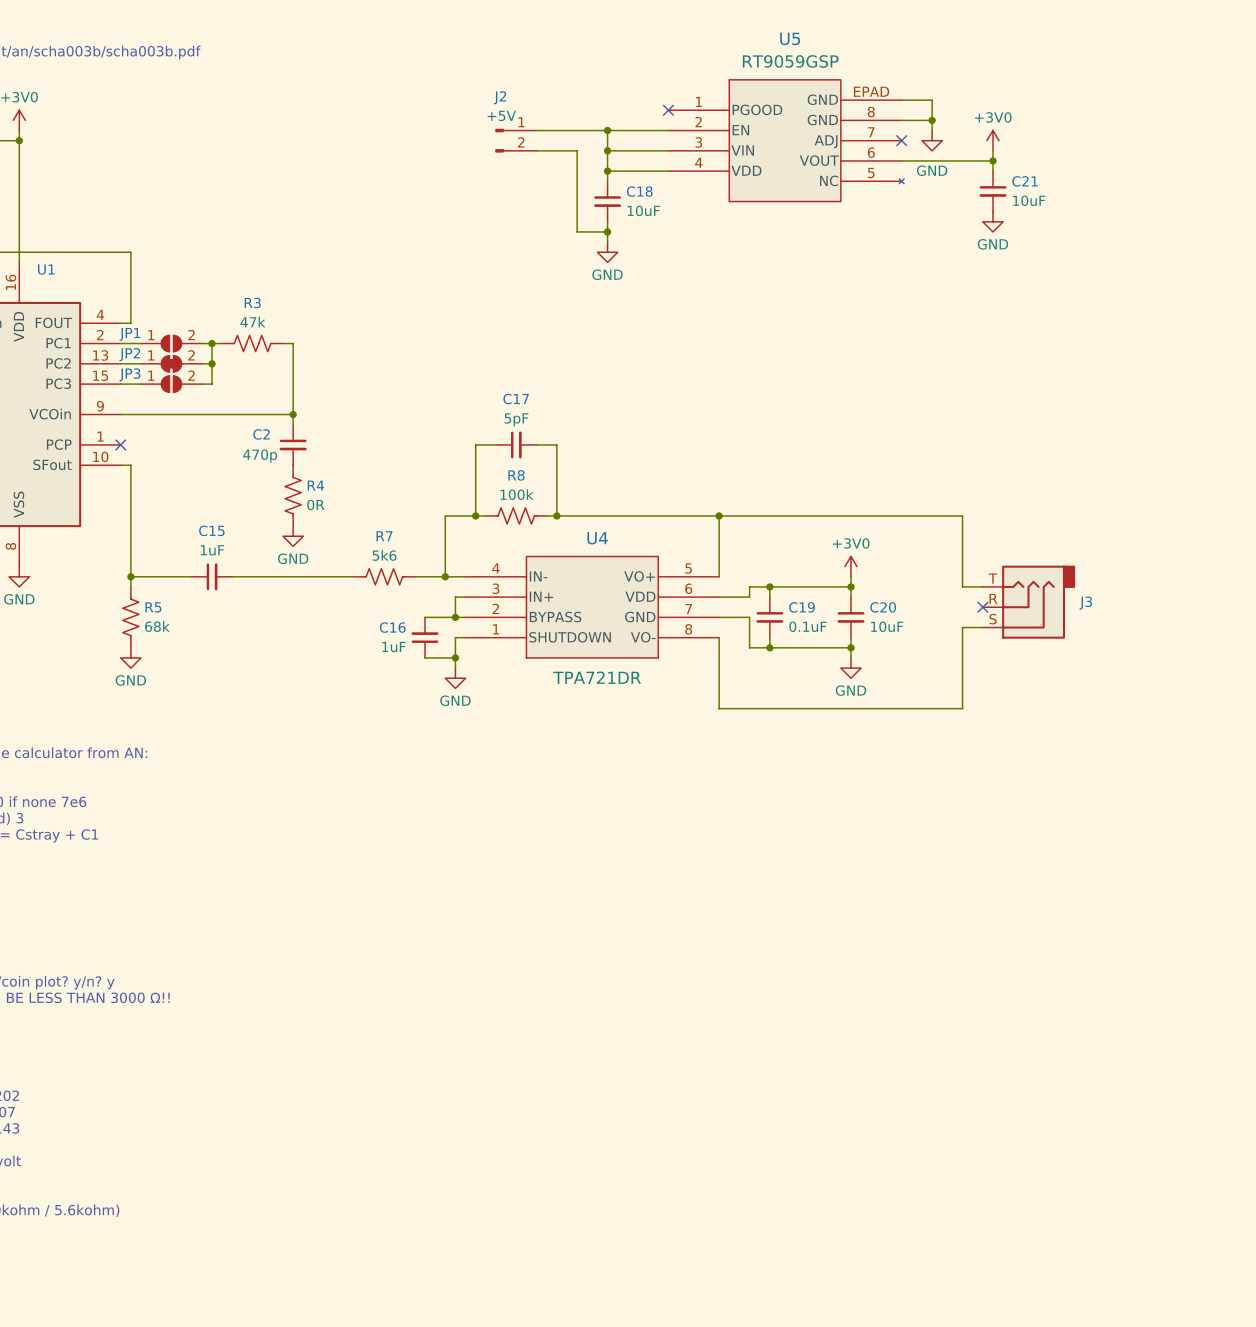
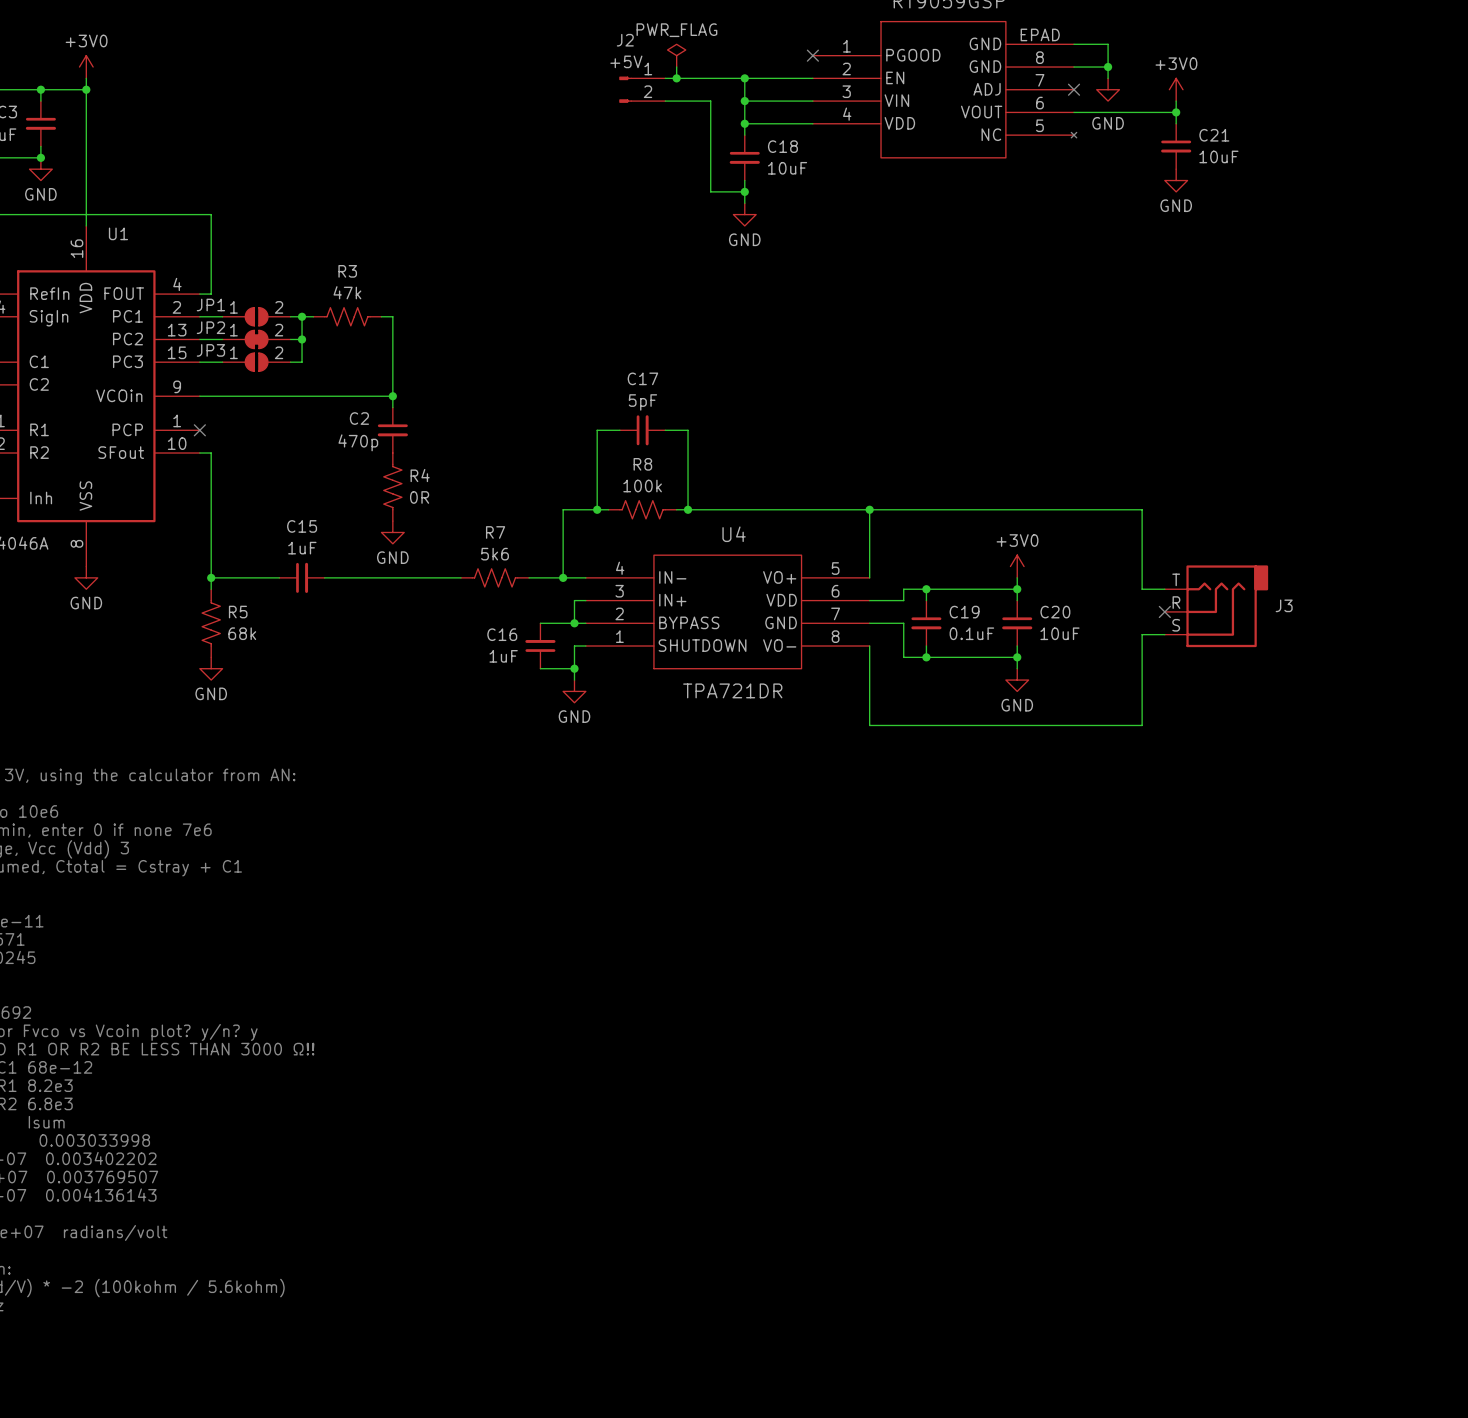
power symbol: none -> PWR_FLAG (676, 55)
wire: none -> (676, 67) (676, 78)
junction: none -> (676, 78)

